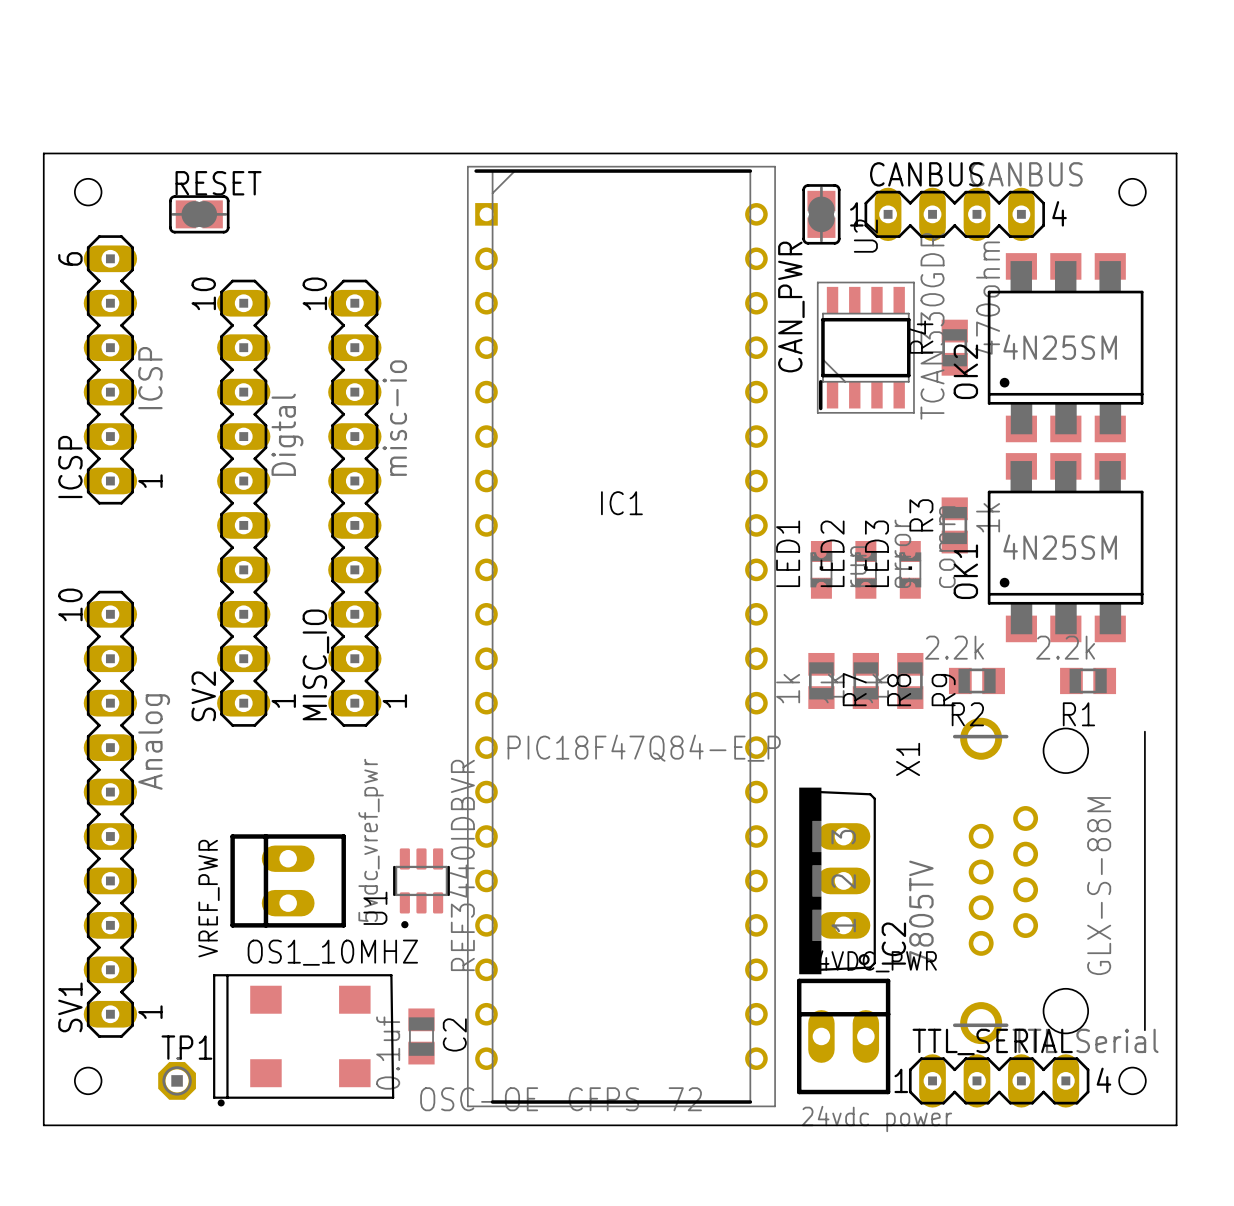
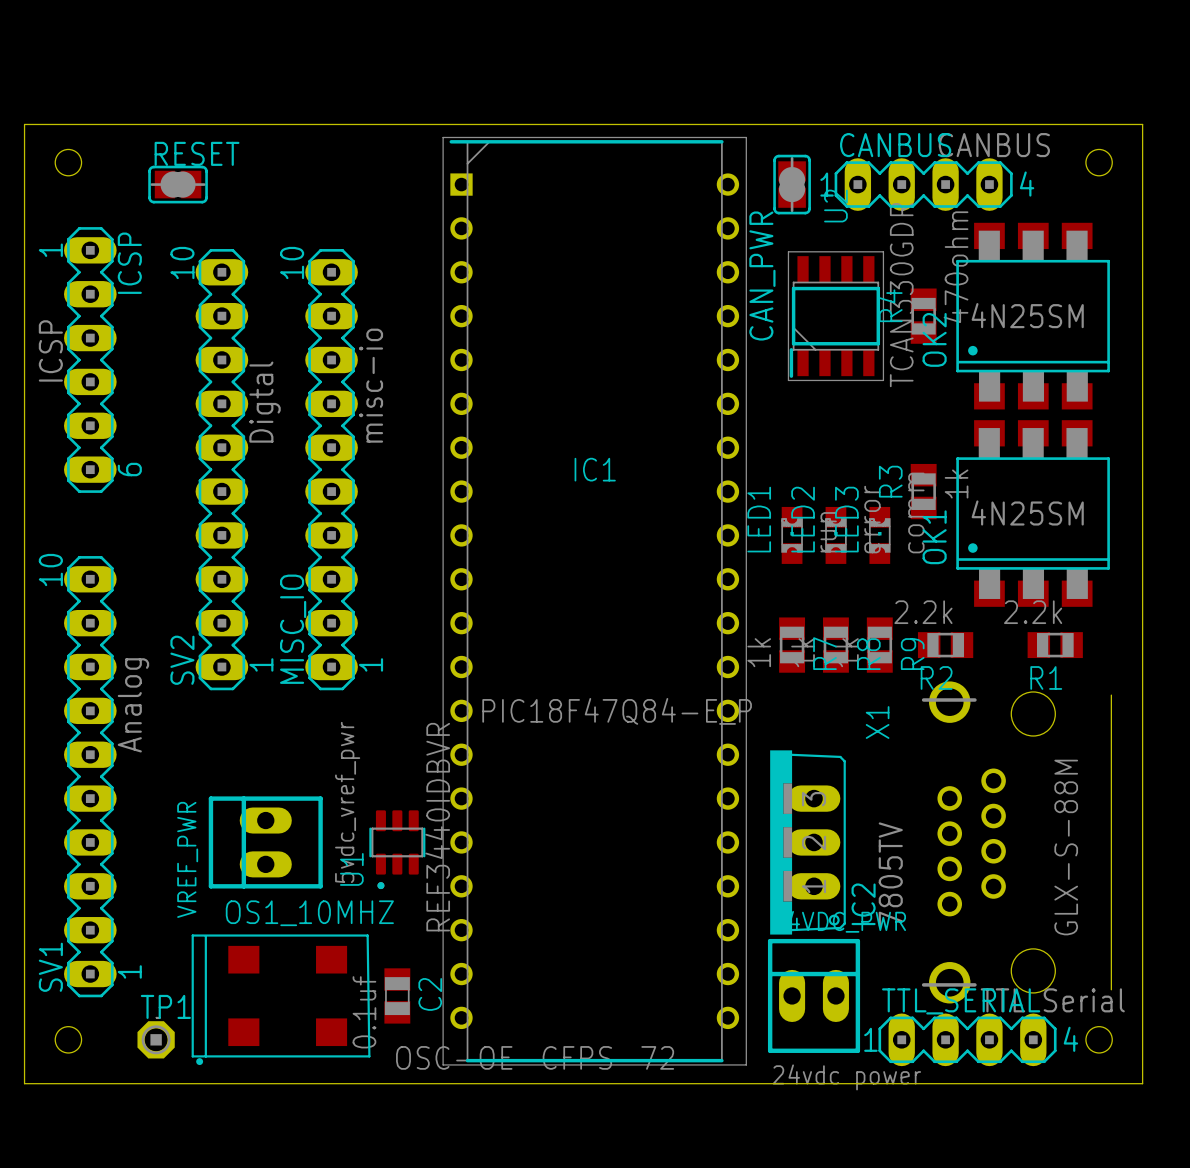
ICSP: ICSP (110, 369) -> none
ICSP: none -> ICSP (90, 360)

